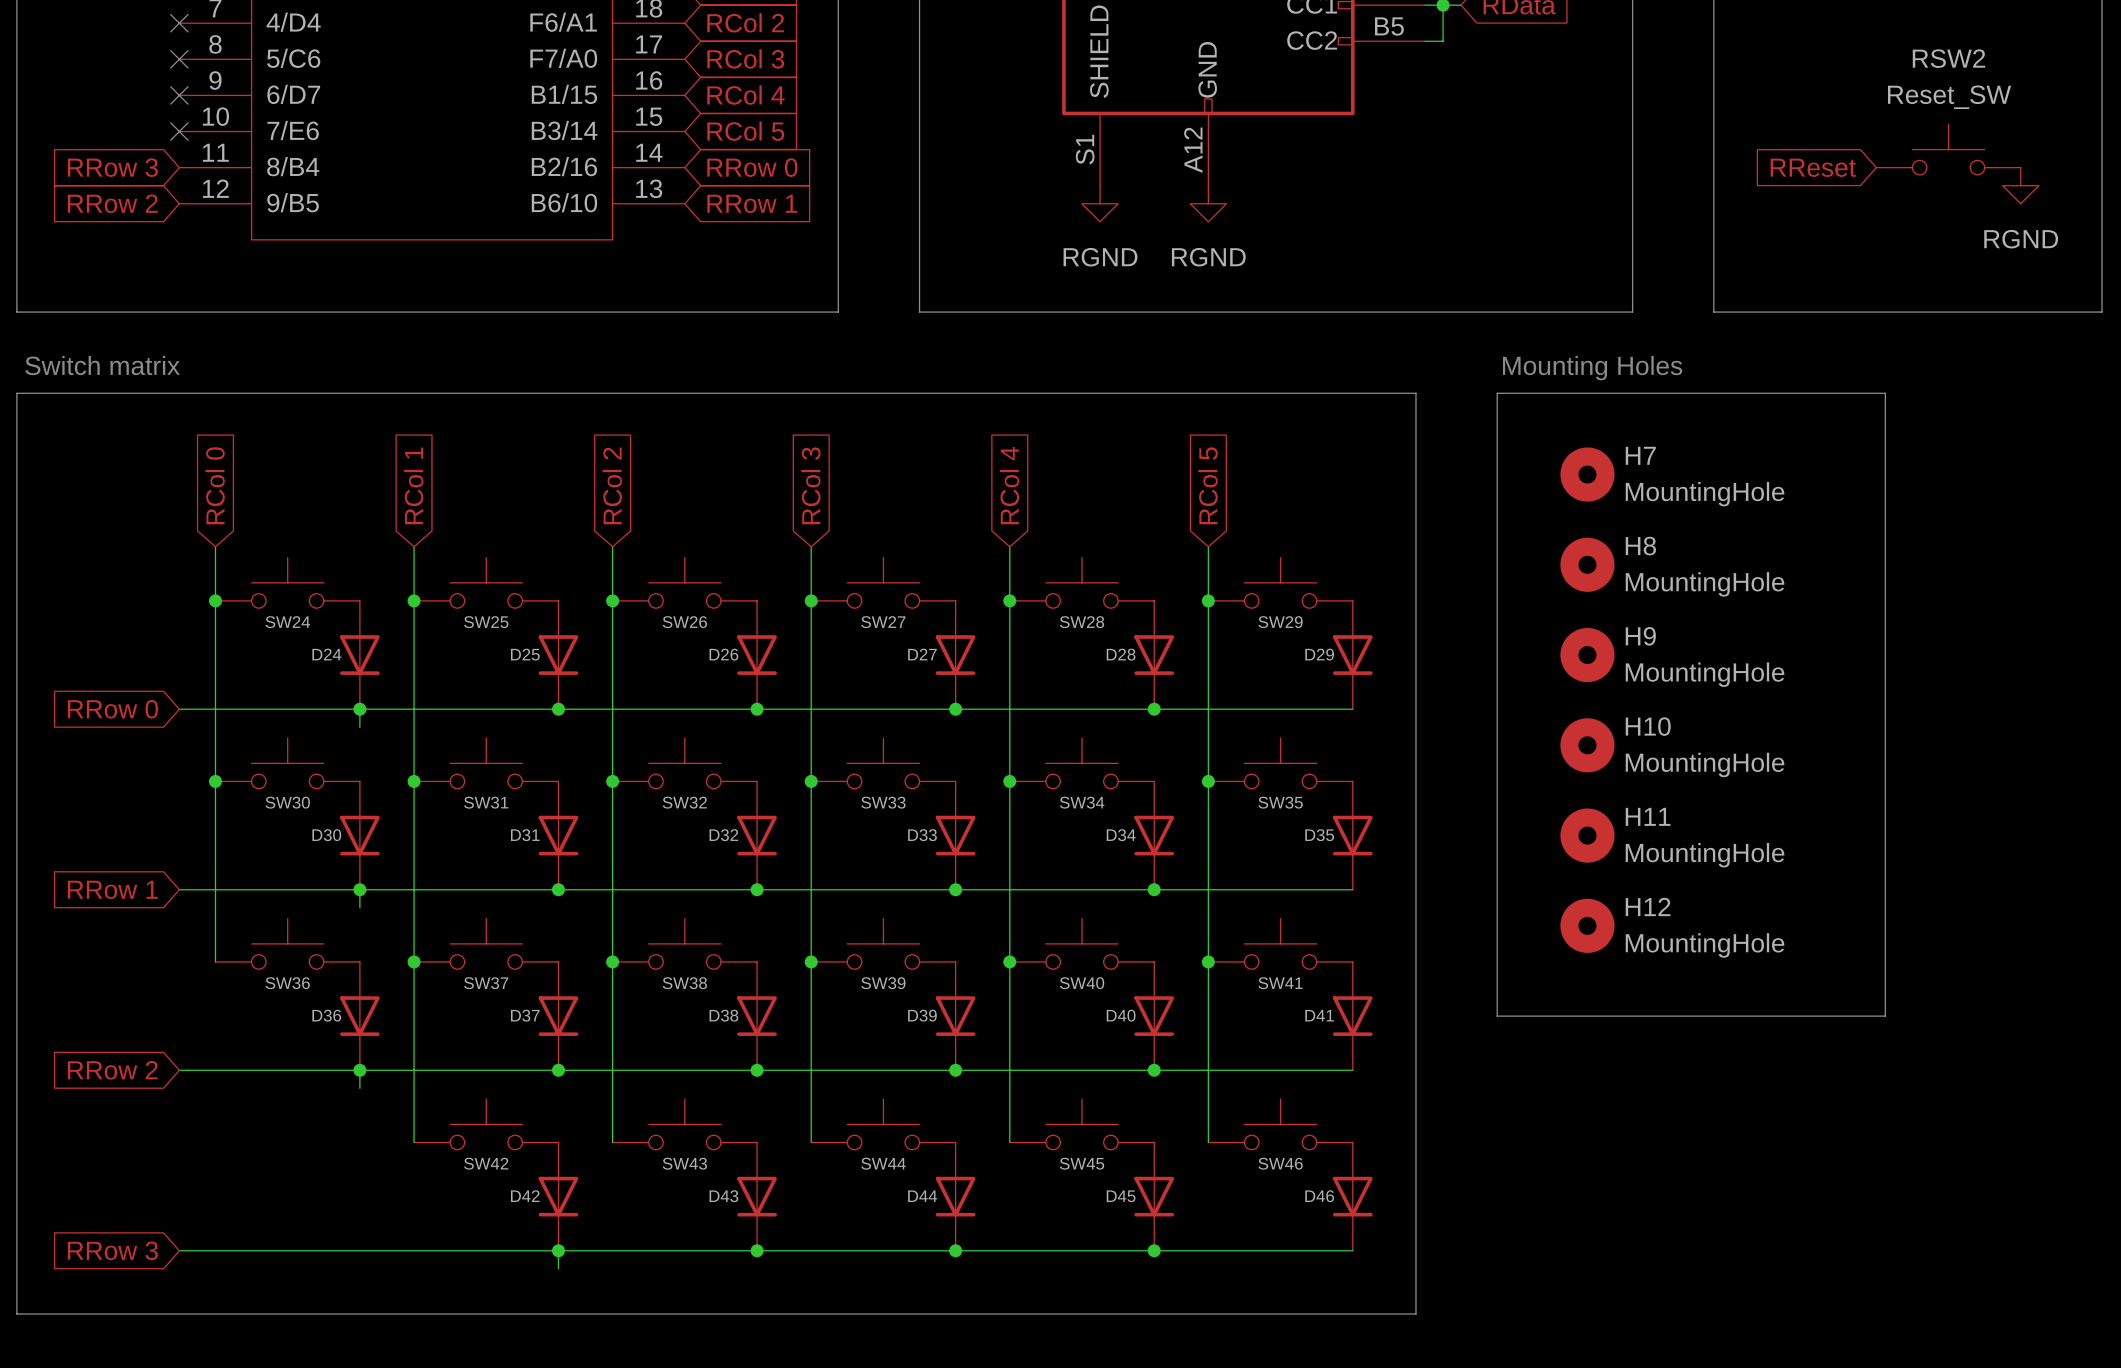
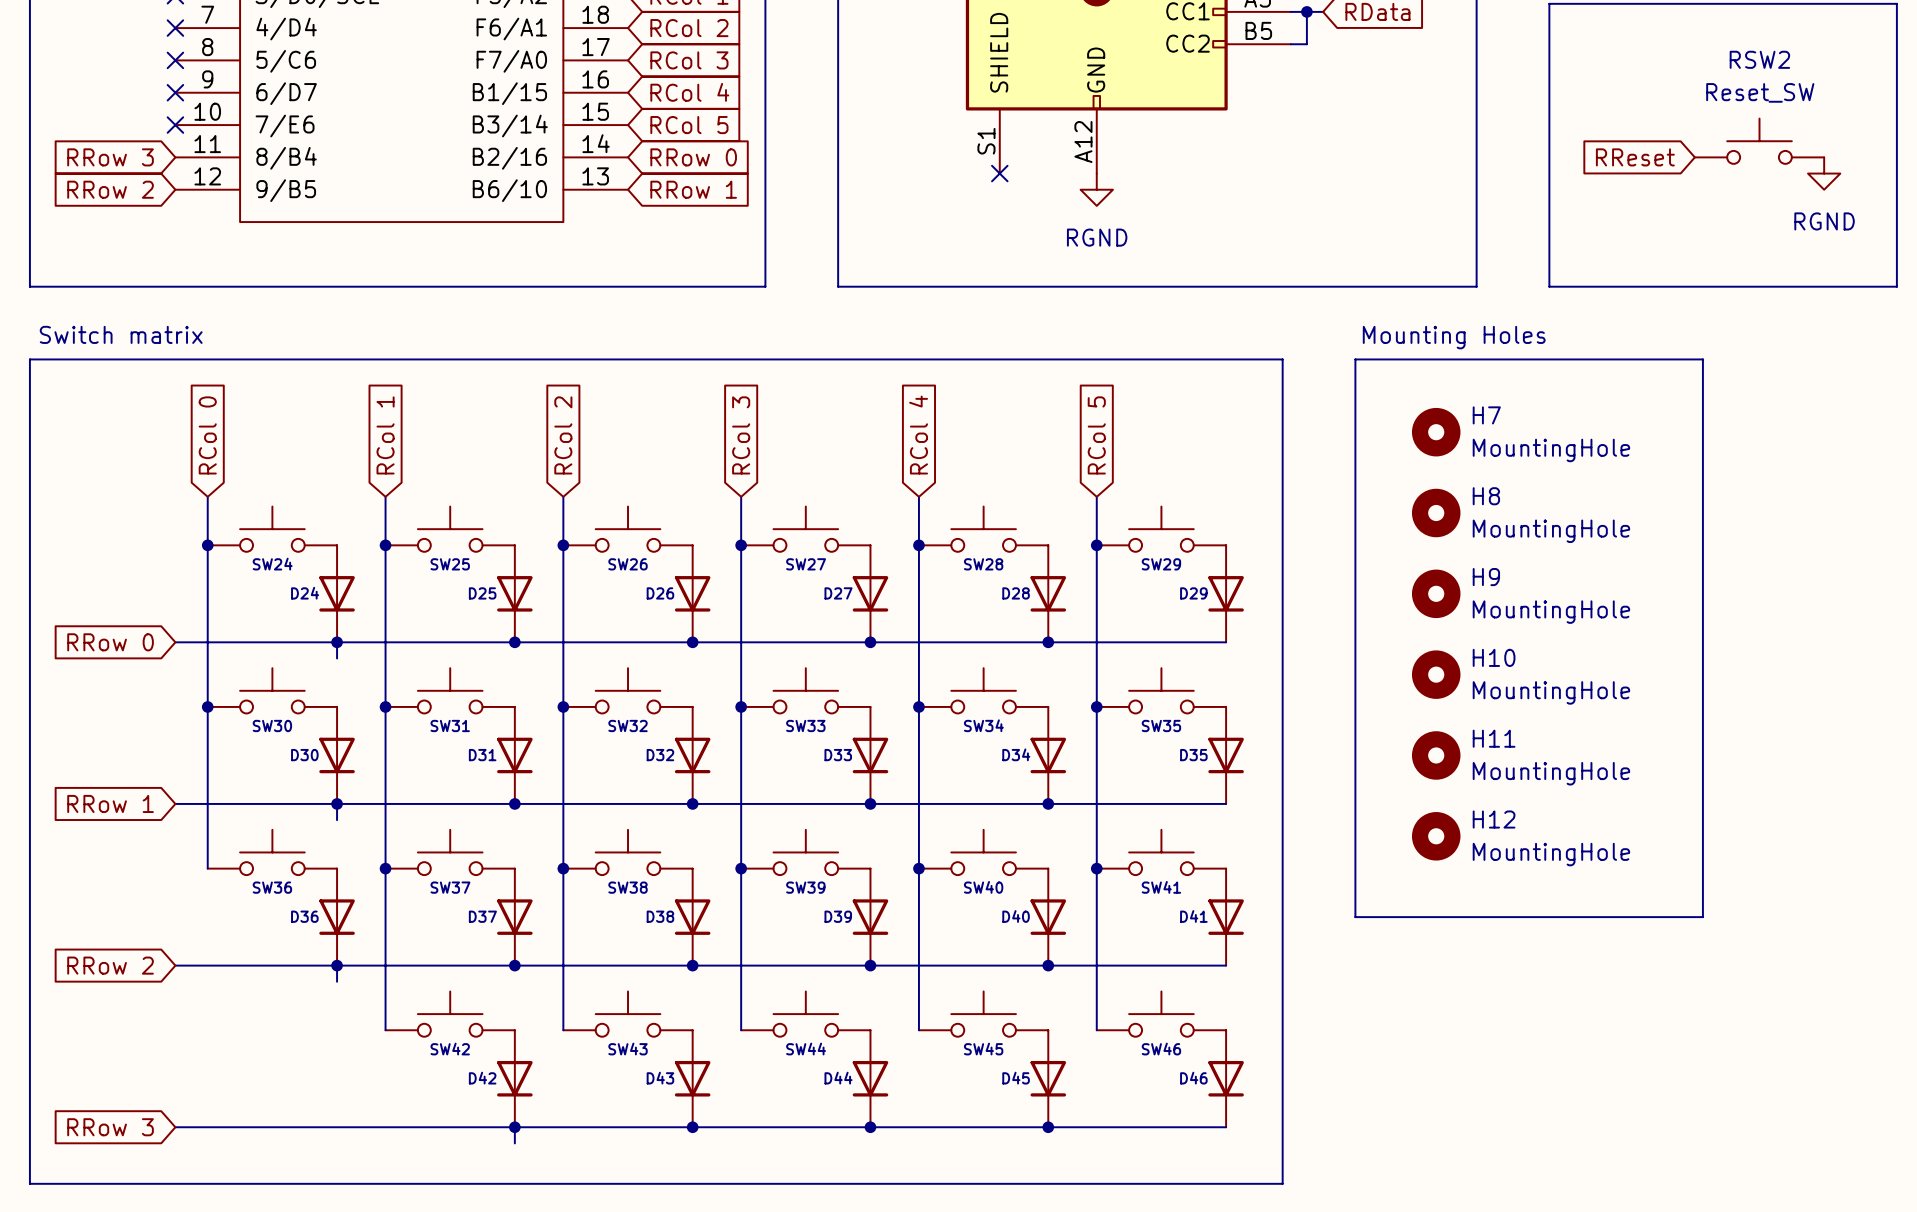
no-connect mark: none -> (999, 173)
power symbol: RGND (1100, 203) -> none

